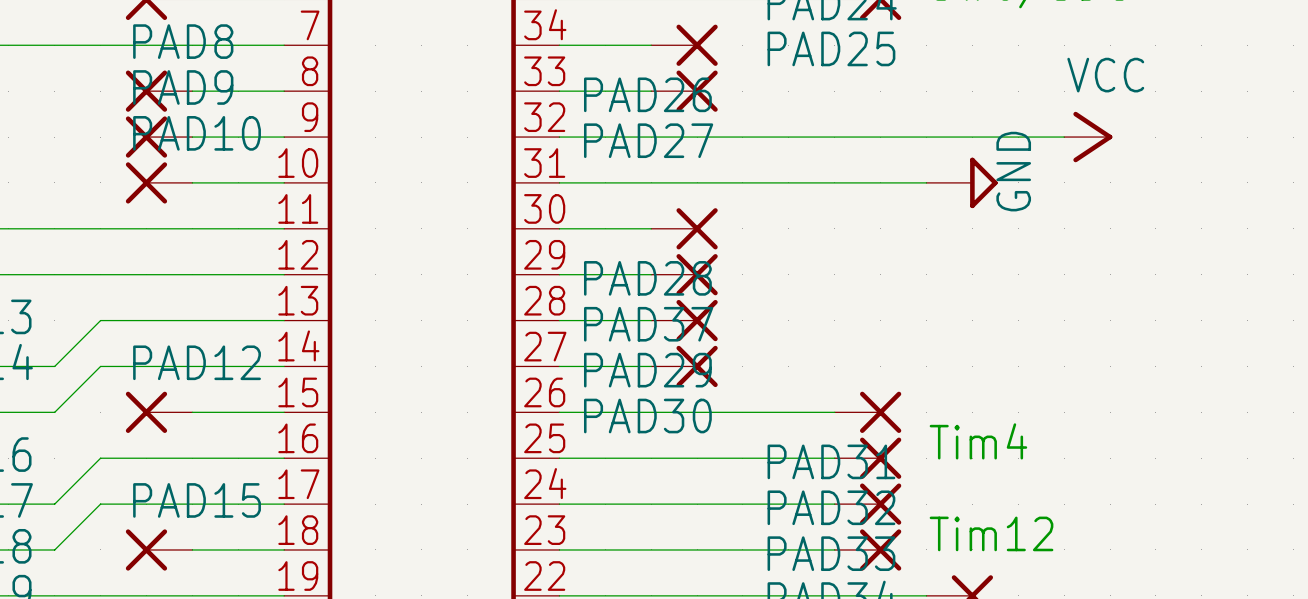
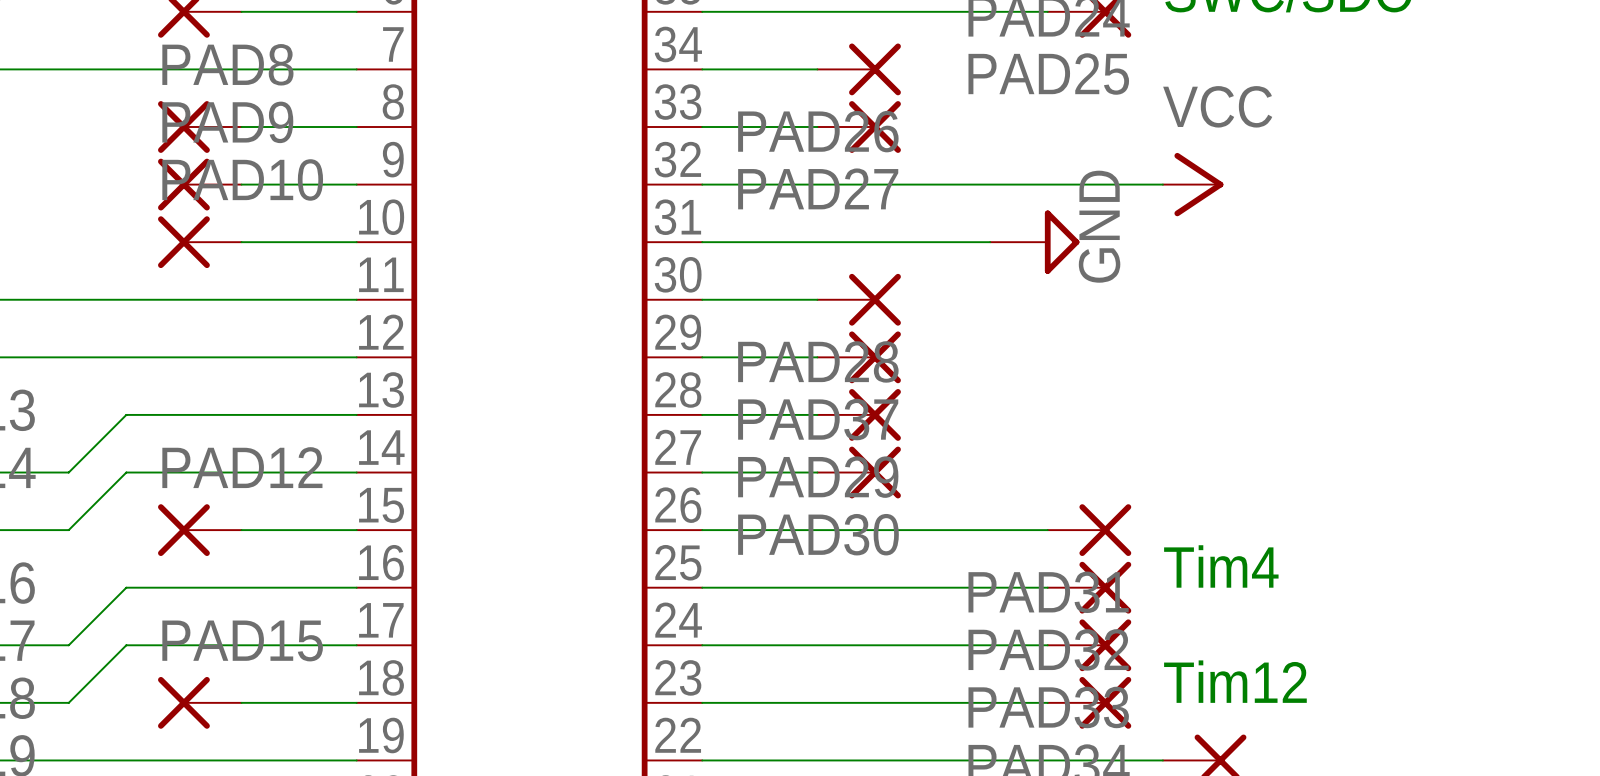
wire: (926, 137) (1064, 137) -> none
power symbol position: VCC (1088, 137) -> VCC (1193, 184)
wire: (788, 182) (926, 182) -> none
power symbol position: GND (962, 182) -> GND (1034, 242)

